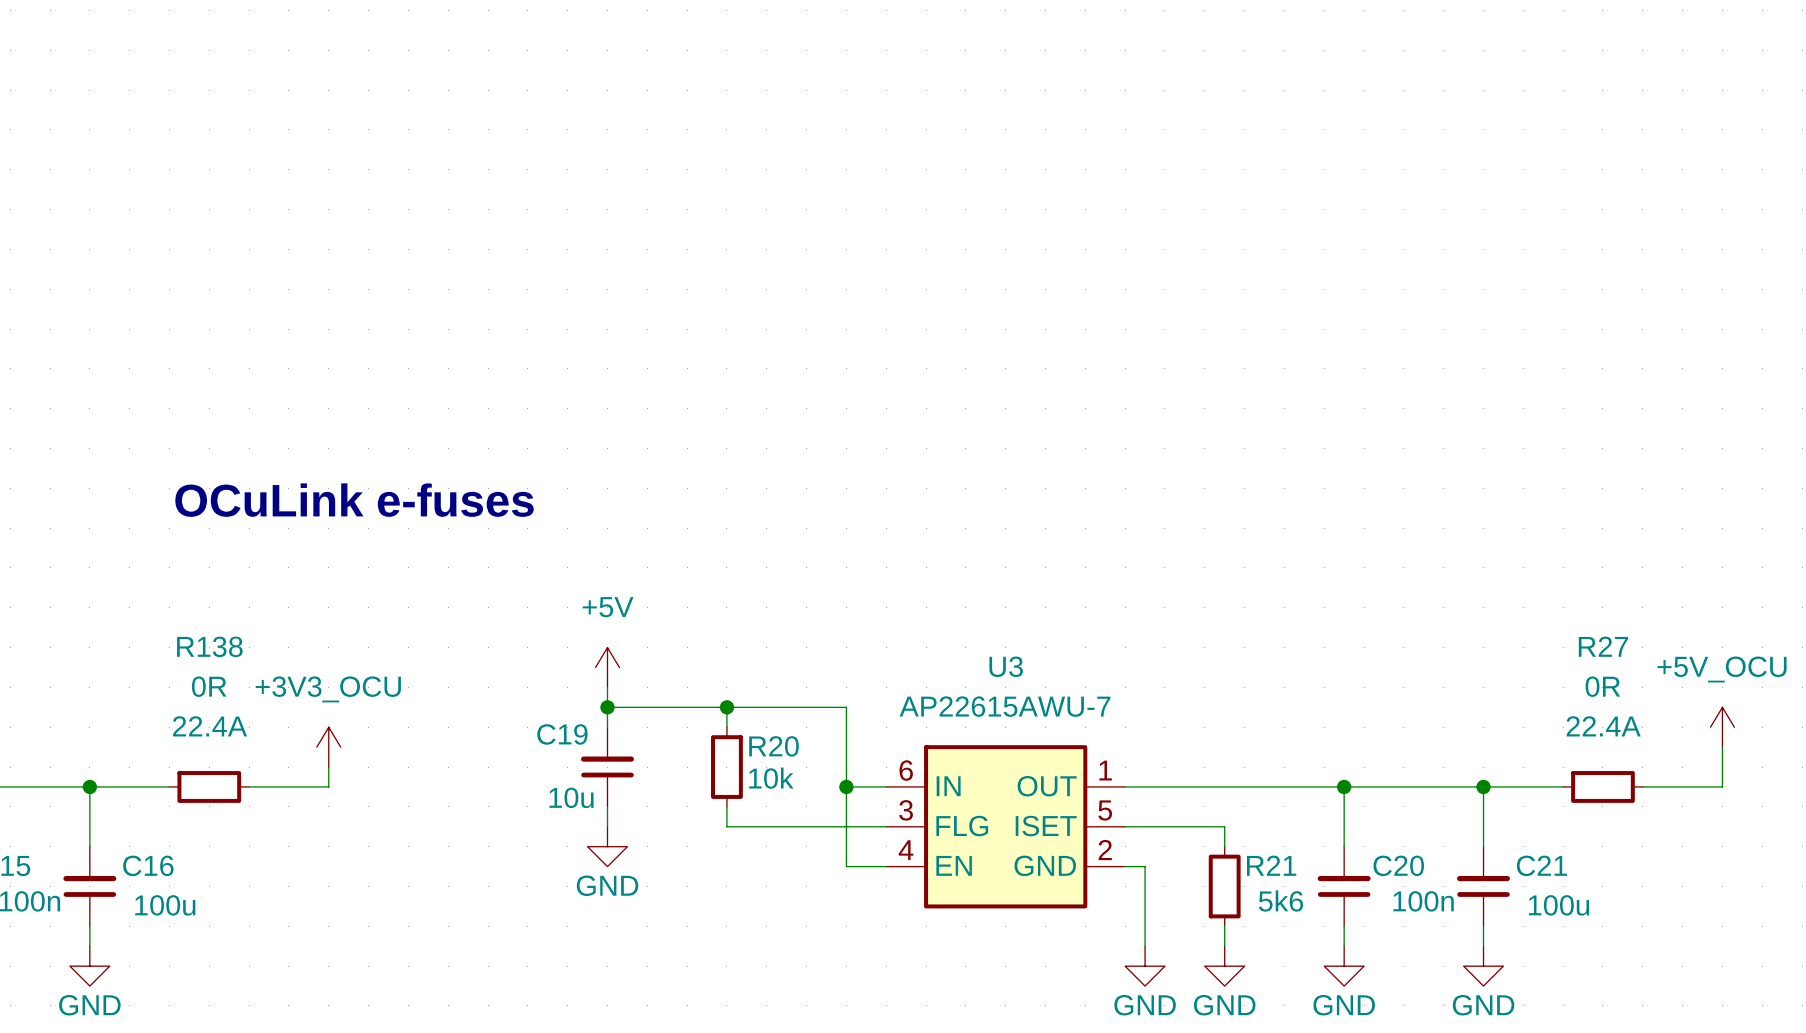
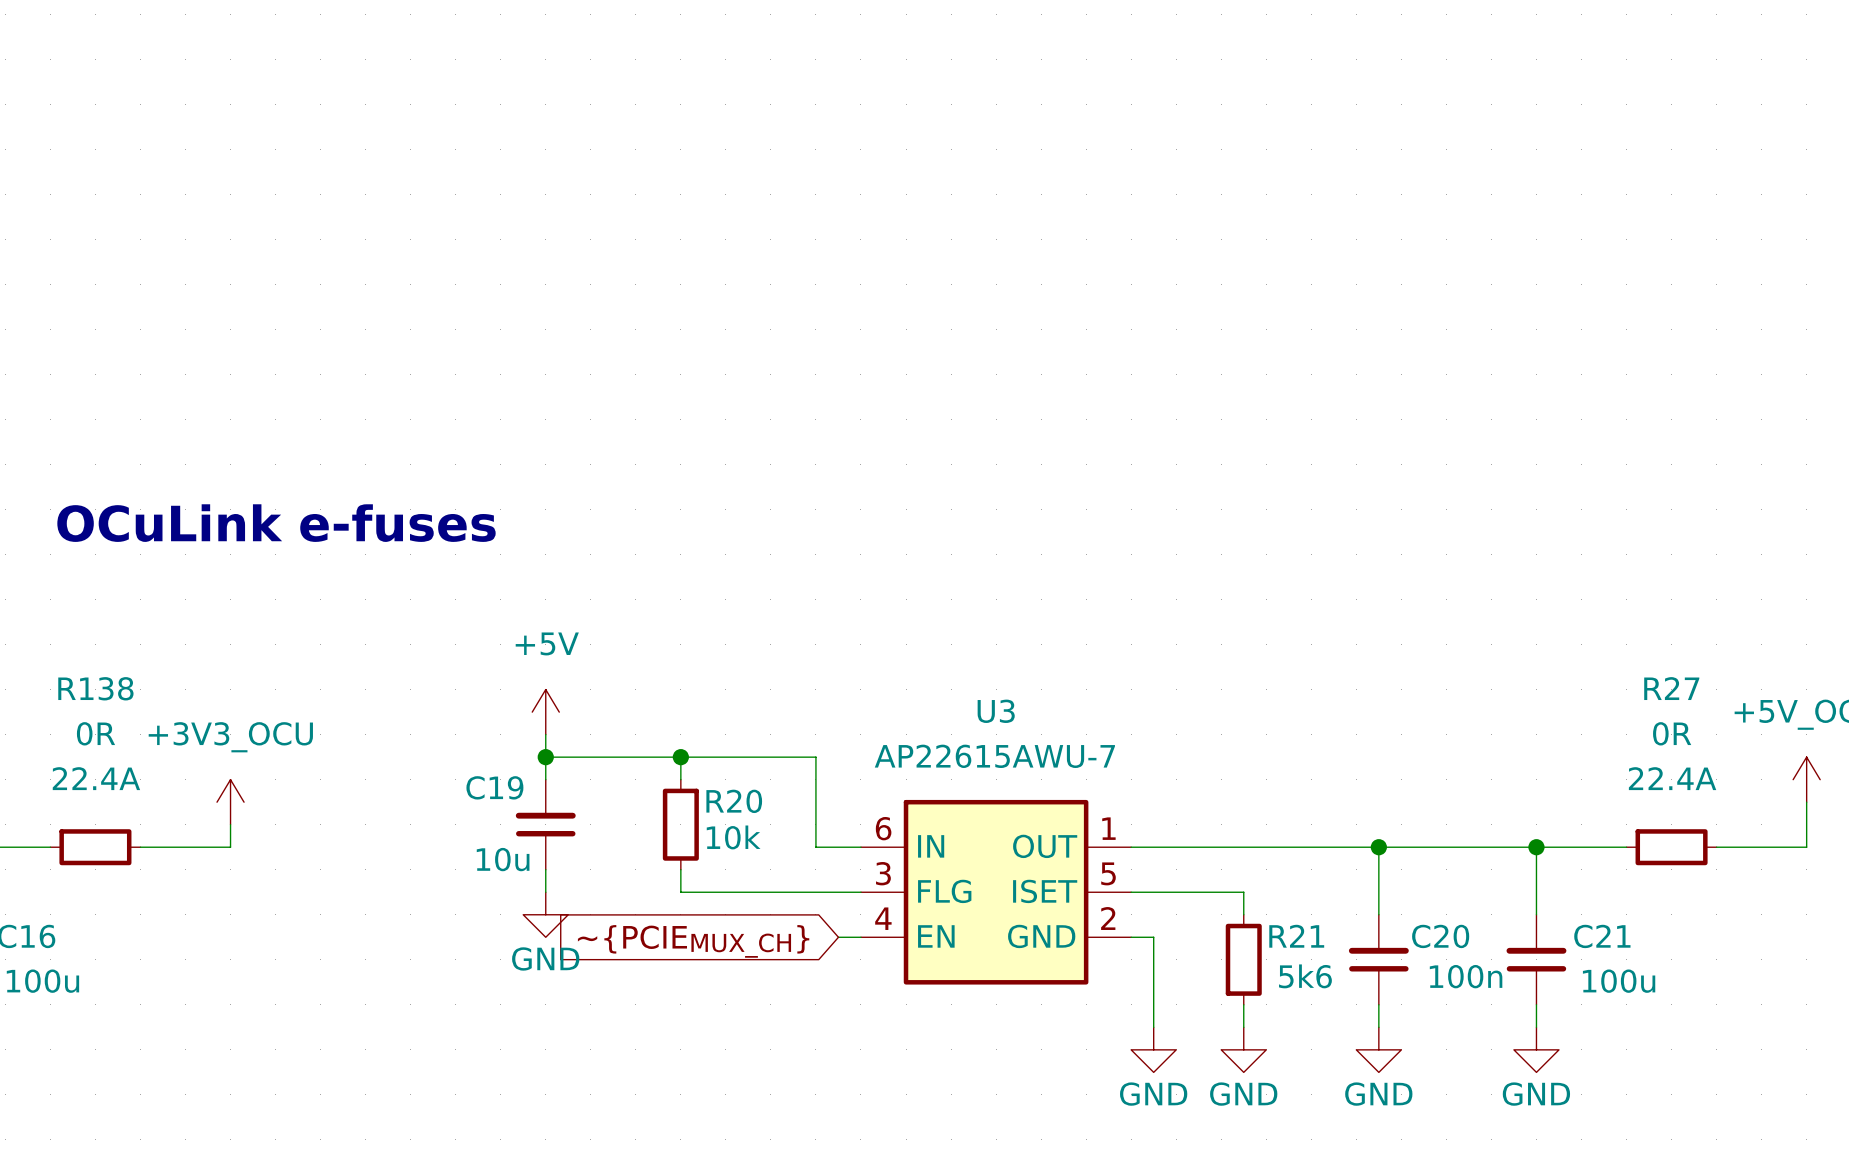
wire: (846, 786) (846, 866) (866, 866) -> none
junction: (846, 786) -> none
global label: none -> ~{PCIEMUX_CH} (693, 941)

